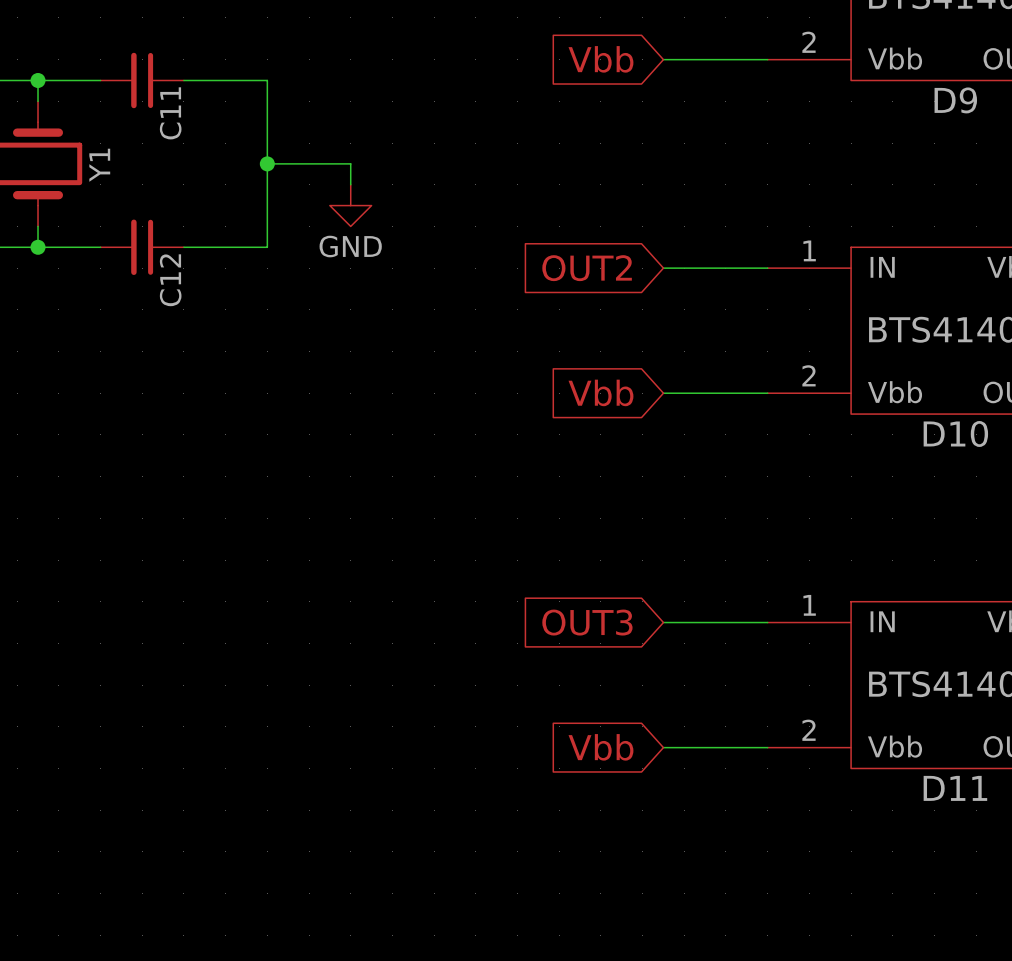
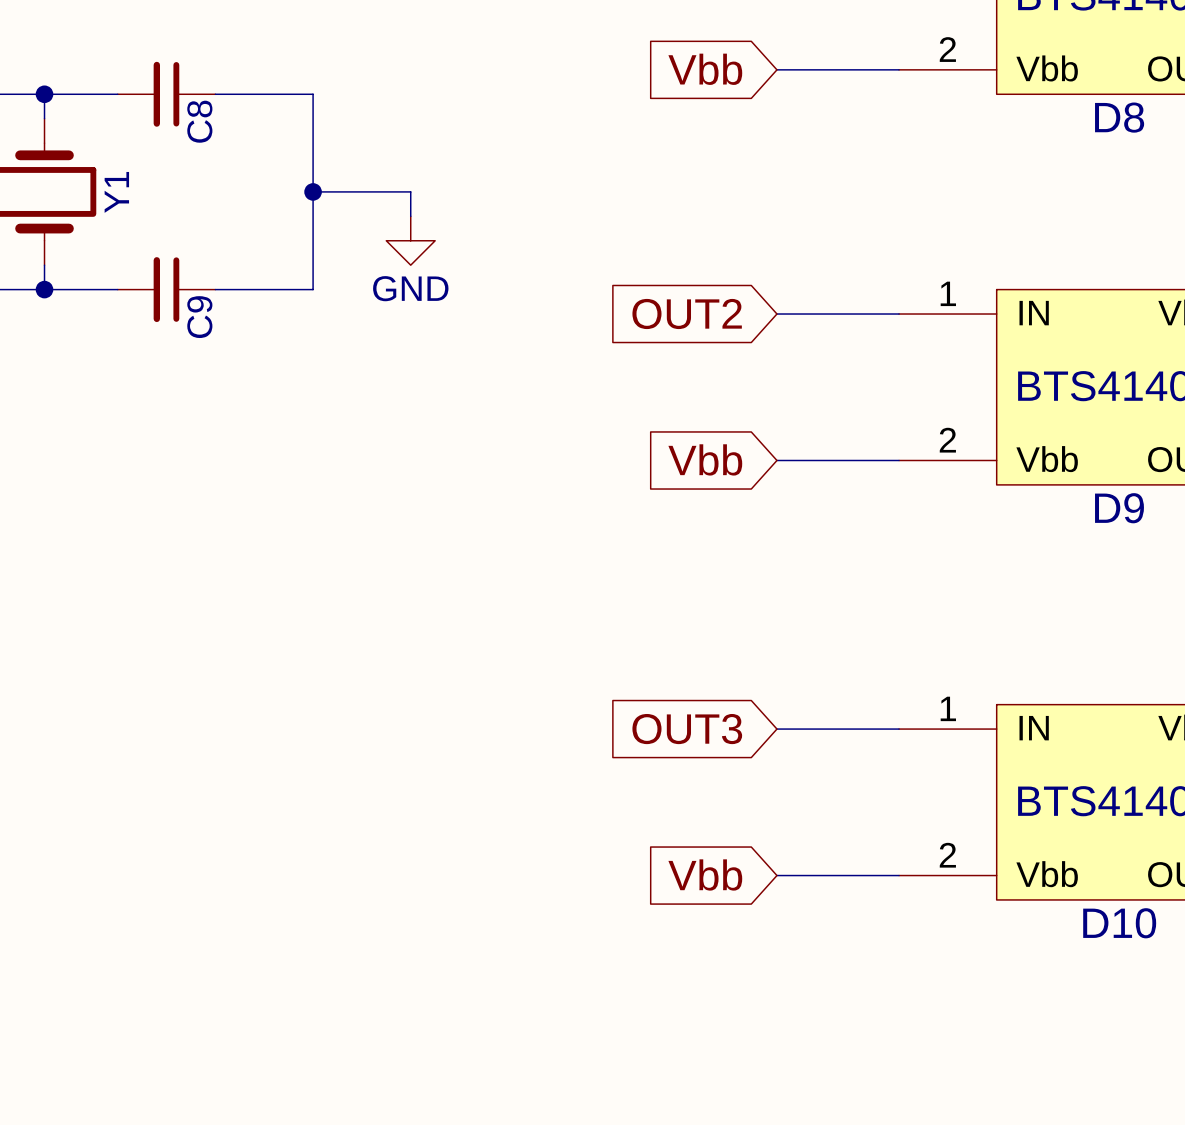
D9 name: D9 (955, 100) -> D8 (1119, 117)
C11 name: C11 (170, 113) -> C8 (199, 121)
C12 name: C12 (170, 280) -> C9 (199, 317)
D10 name: D10 (955, 433) -> D9 (1119, 508)
D11 name: D11 (955, 788) -> D10 (1119, 923)

